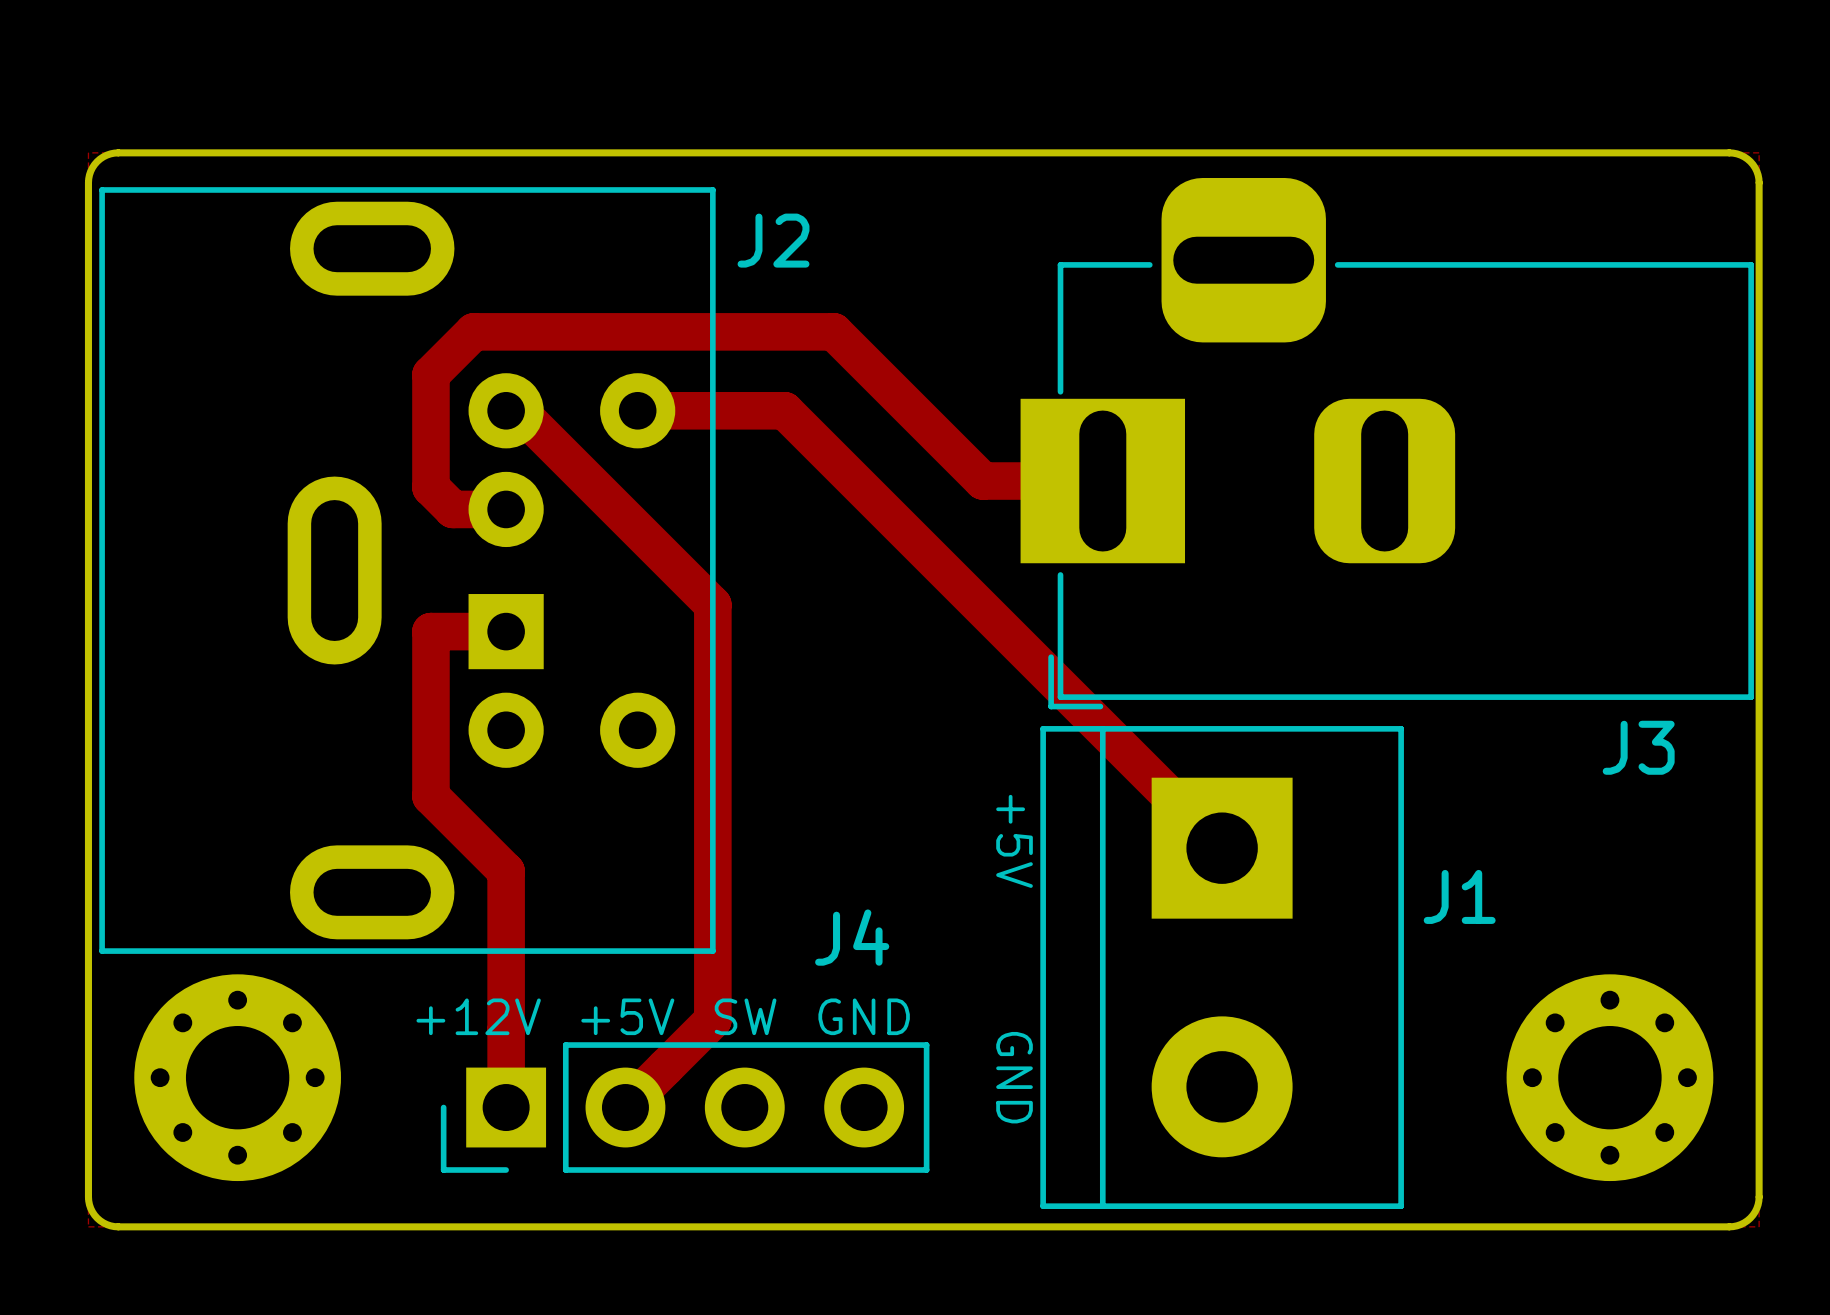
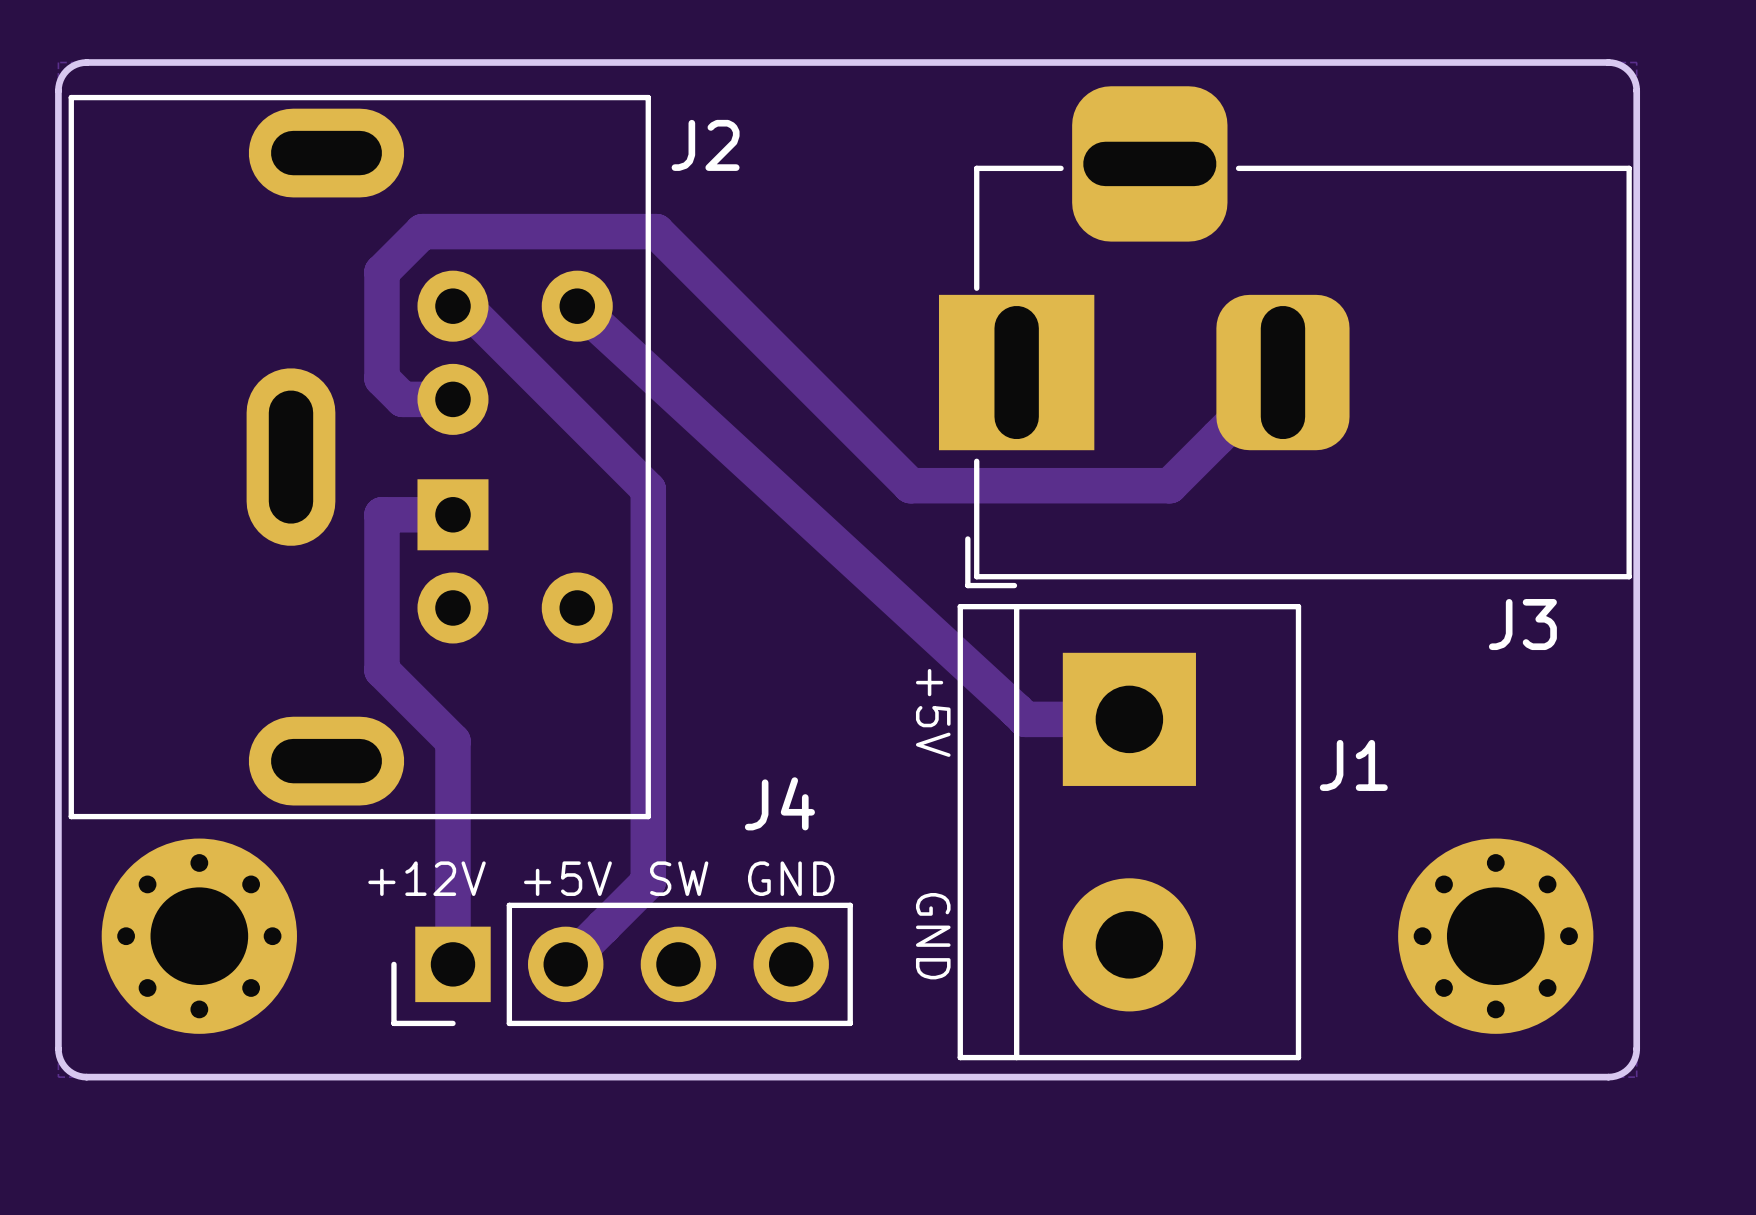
track: (721, 331) (833, 331) (982, 481) (1102, 481) -> (656, 231) (910, 485) (1169, 485) (1282, 372)
track: (637, 410) (784, 410) (1222, 848) -> (577, 306) (1025, 719) (1129, 719)

